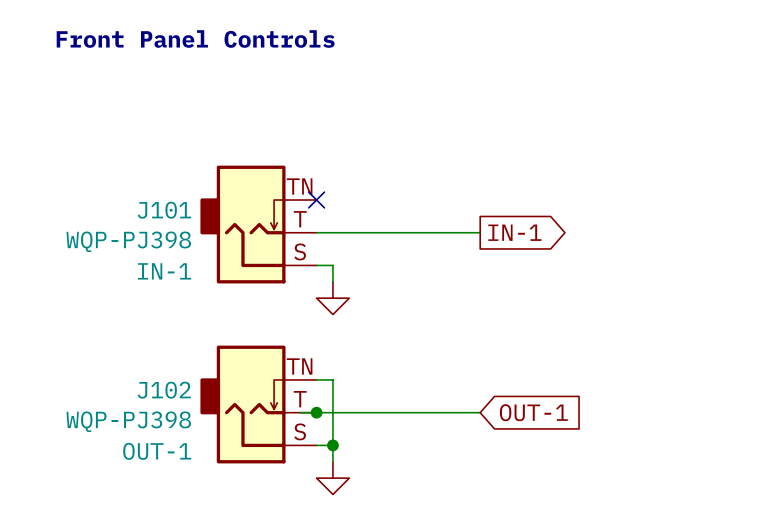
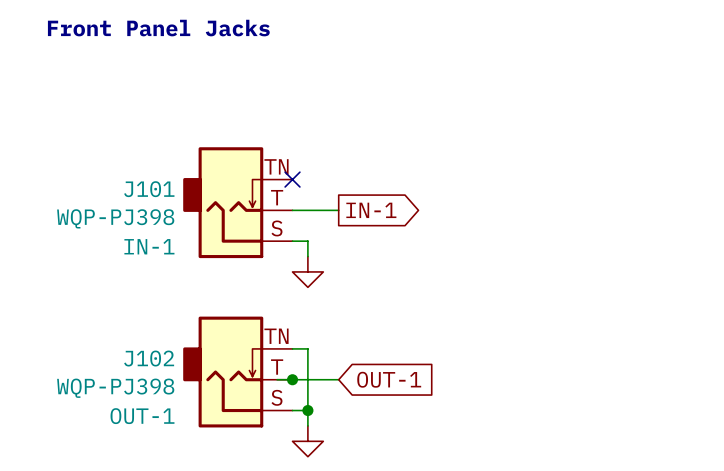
text: Front Panel Controls (195, 39) -> Front Panel Jacks (158, 28)
wire: (365, 232) (480, 232) -> none
global label position: IN-1 (514, 232) -> IN-1 (371, 210)
wire: (365, 412) (480, 412) -> none
global label position: OUT-1 (533, 412) -> OUT-1 (389, 379)

